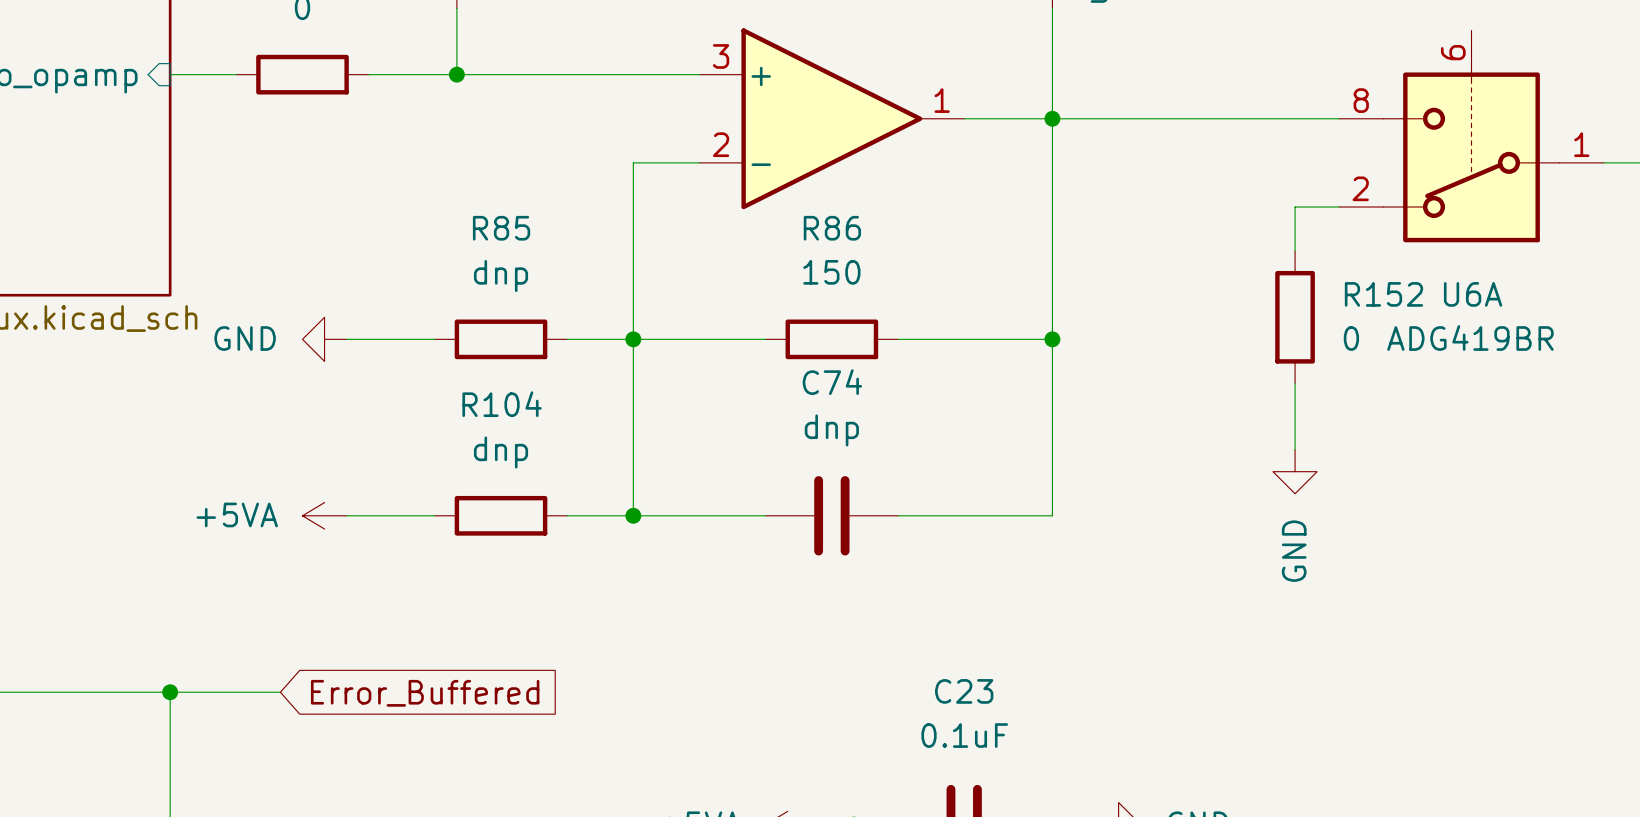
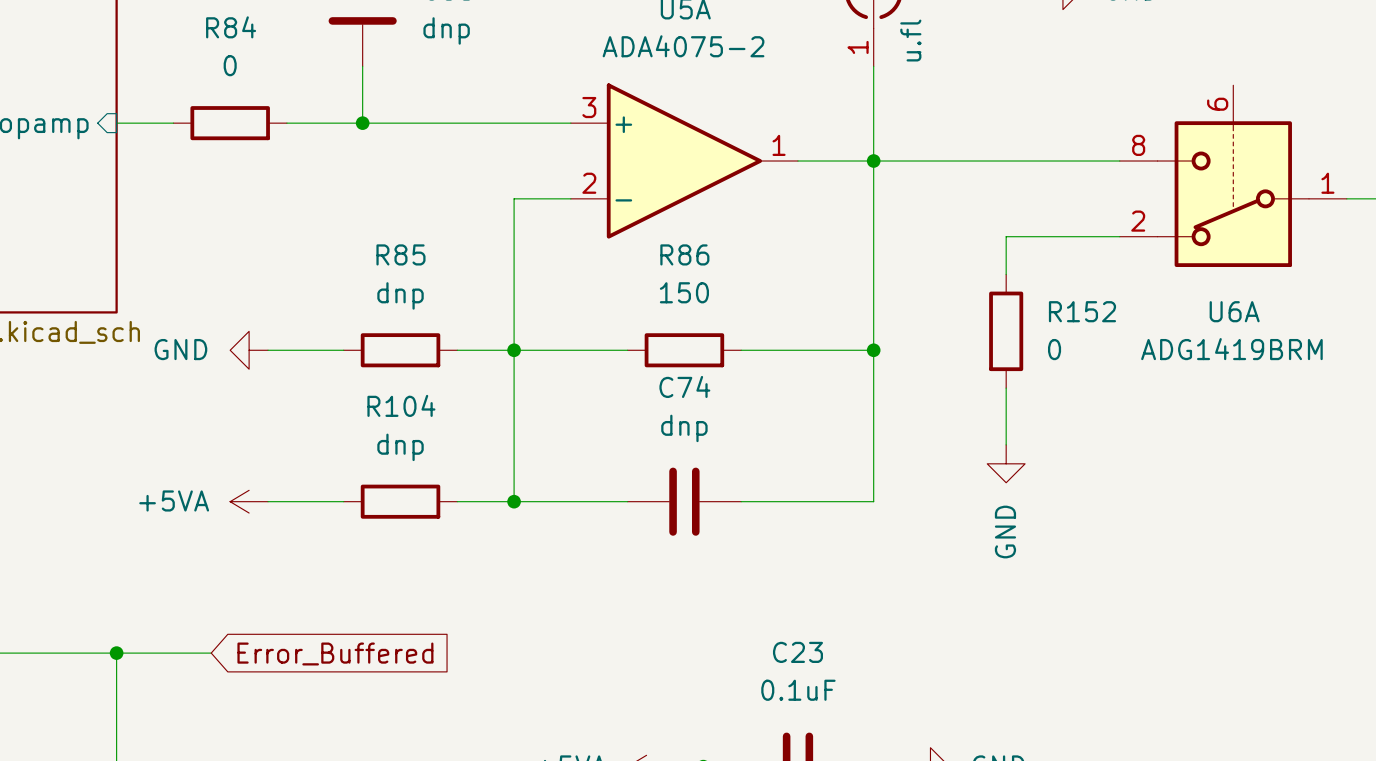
wire: (1295, 207) (1295, 251) -> (1081, 236) (1006, 236) (1006, 274)
R152 position: (1295, 317) -> (1006, 331)
U6A value: ADG419BR (1470, 337) -> ADG1419BRM (1231, 349)
wire: (1295, 383) (1295, 449) -> (1006, 388) (1006, 444)
power symbol position: GND (1295, 471) -> GND (1006, 463)

